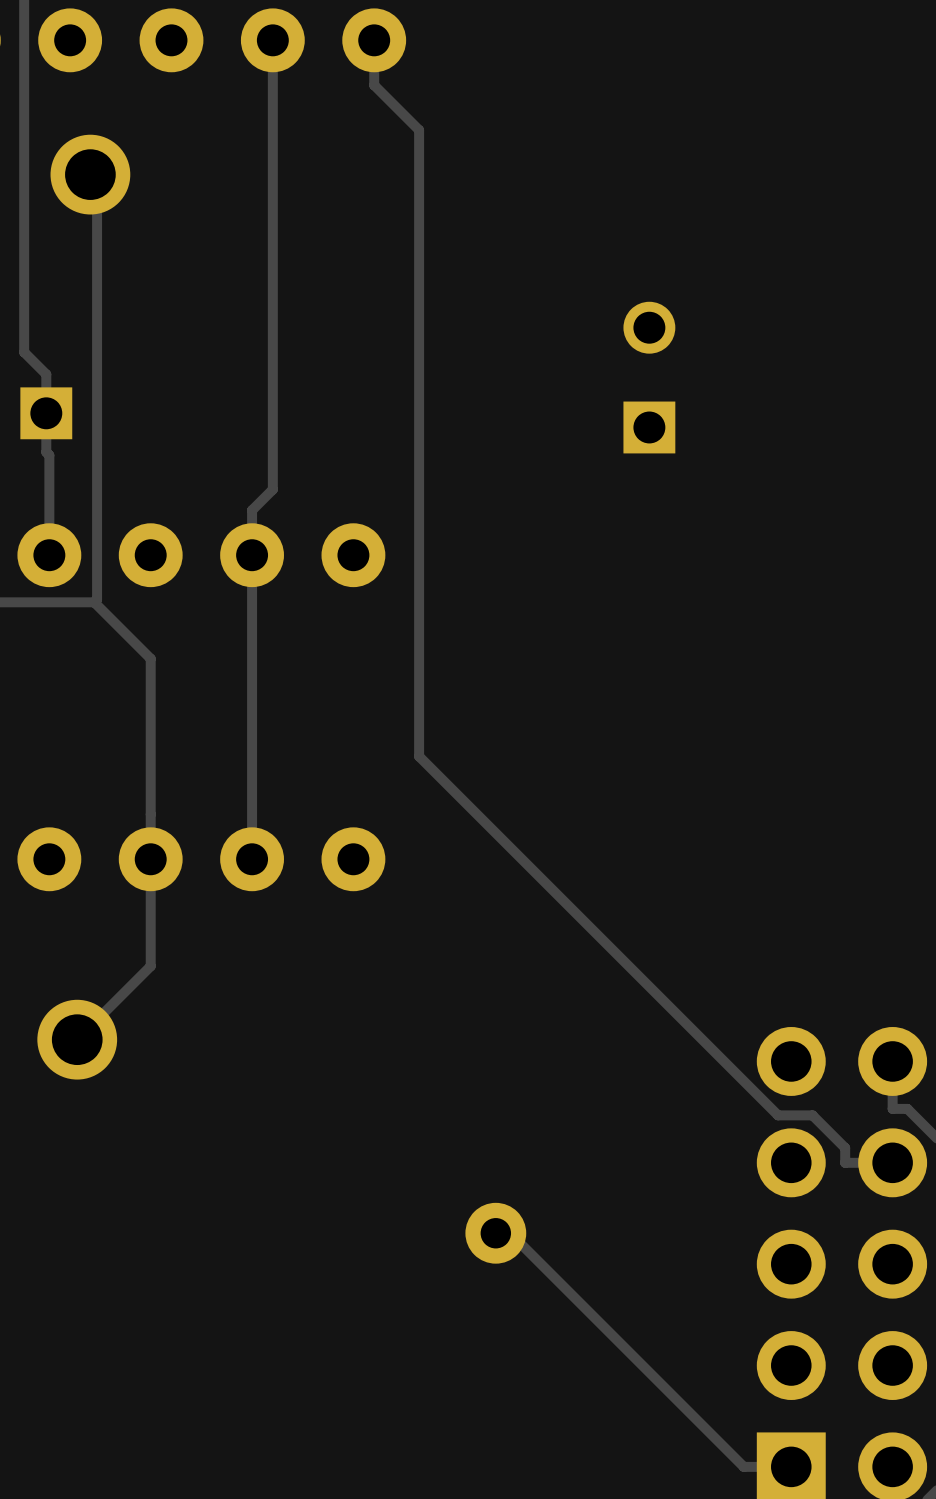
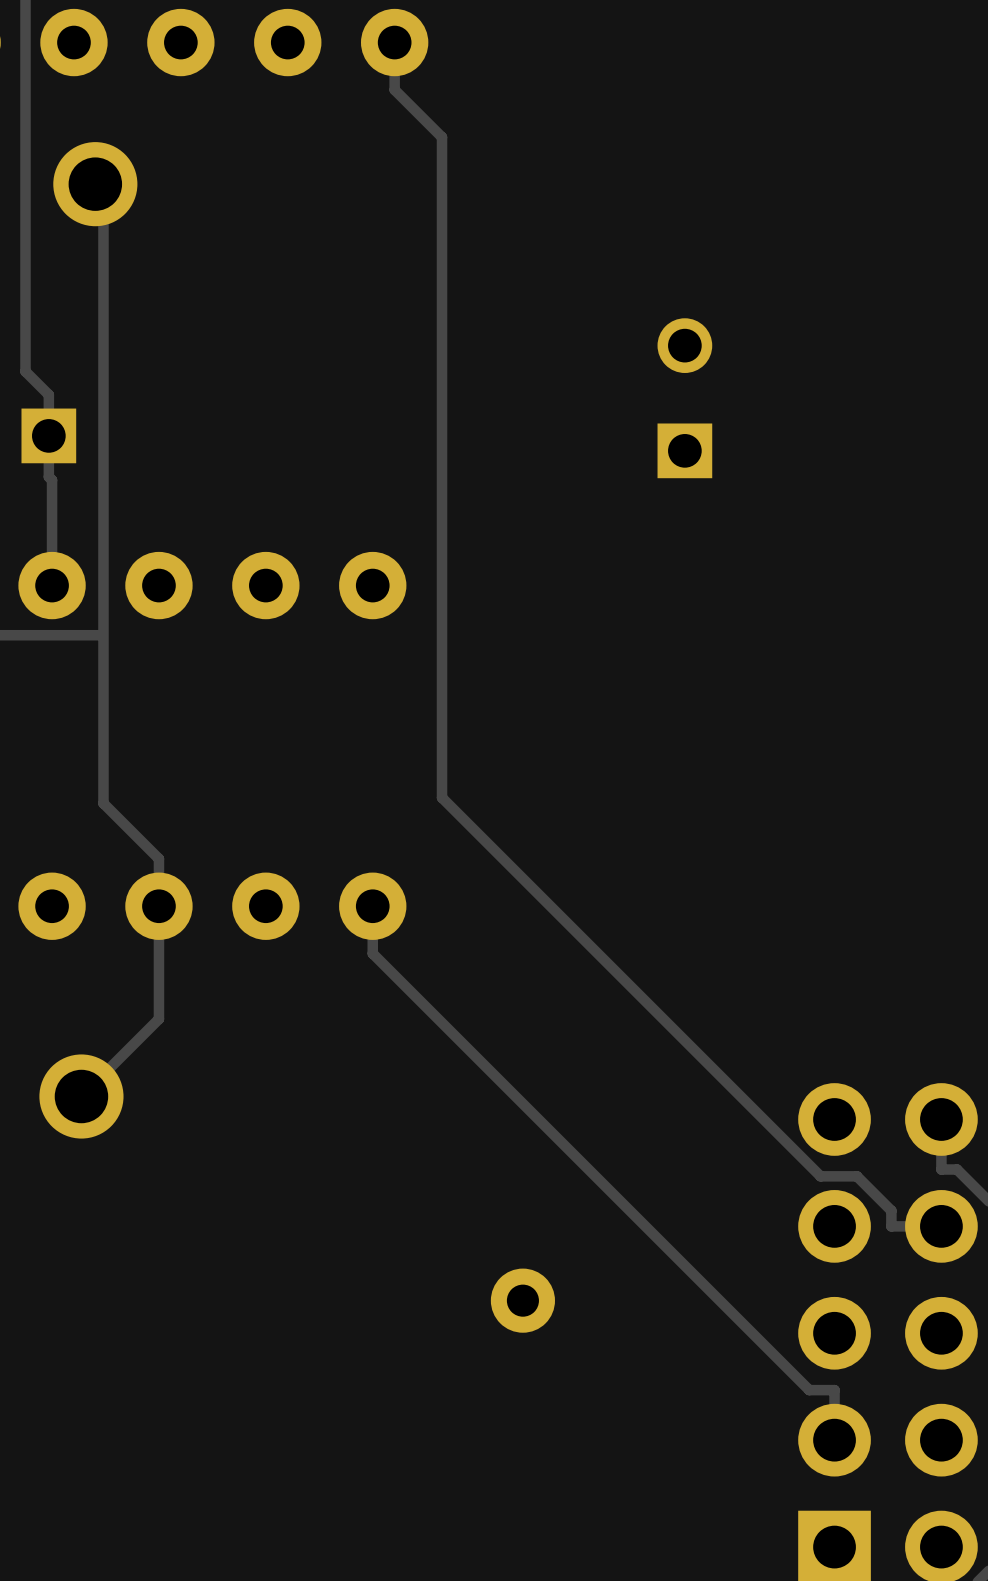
track: (272, 40) (272, 489) (252, 510) (252, 859) -> none
track: (97, 181) (97, 599) (94, 602) (150, 658) (150, 814) -> (102, 191) (103, 803) (158, 858)
track: none -> (372, 906) (372, 953) (809, 1390) (834, 1390) (834, 1440)
track: (495, 1233) (510, 1233) (743, 1466) (791, 1466) -> none

